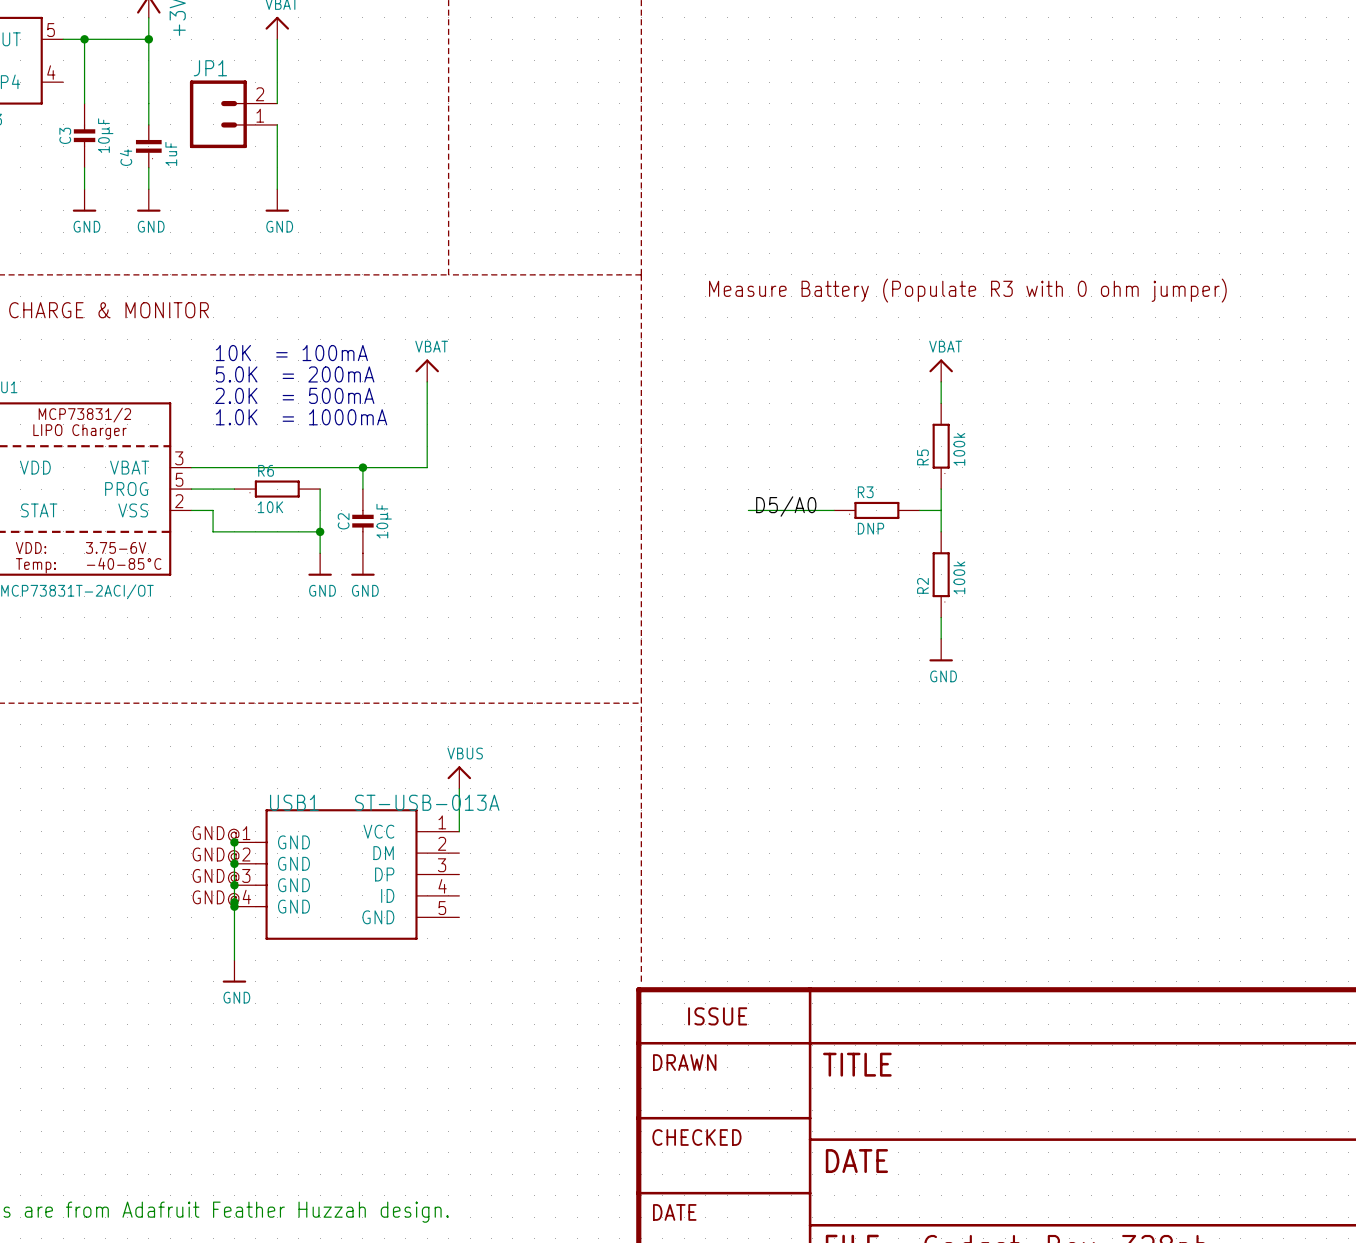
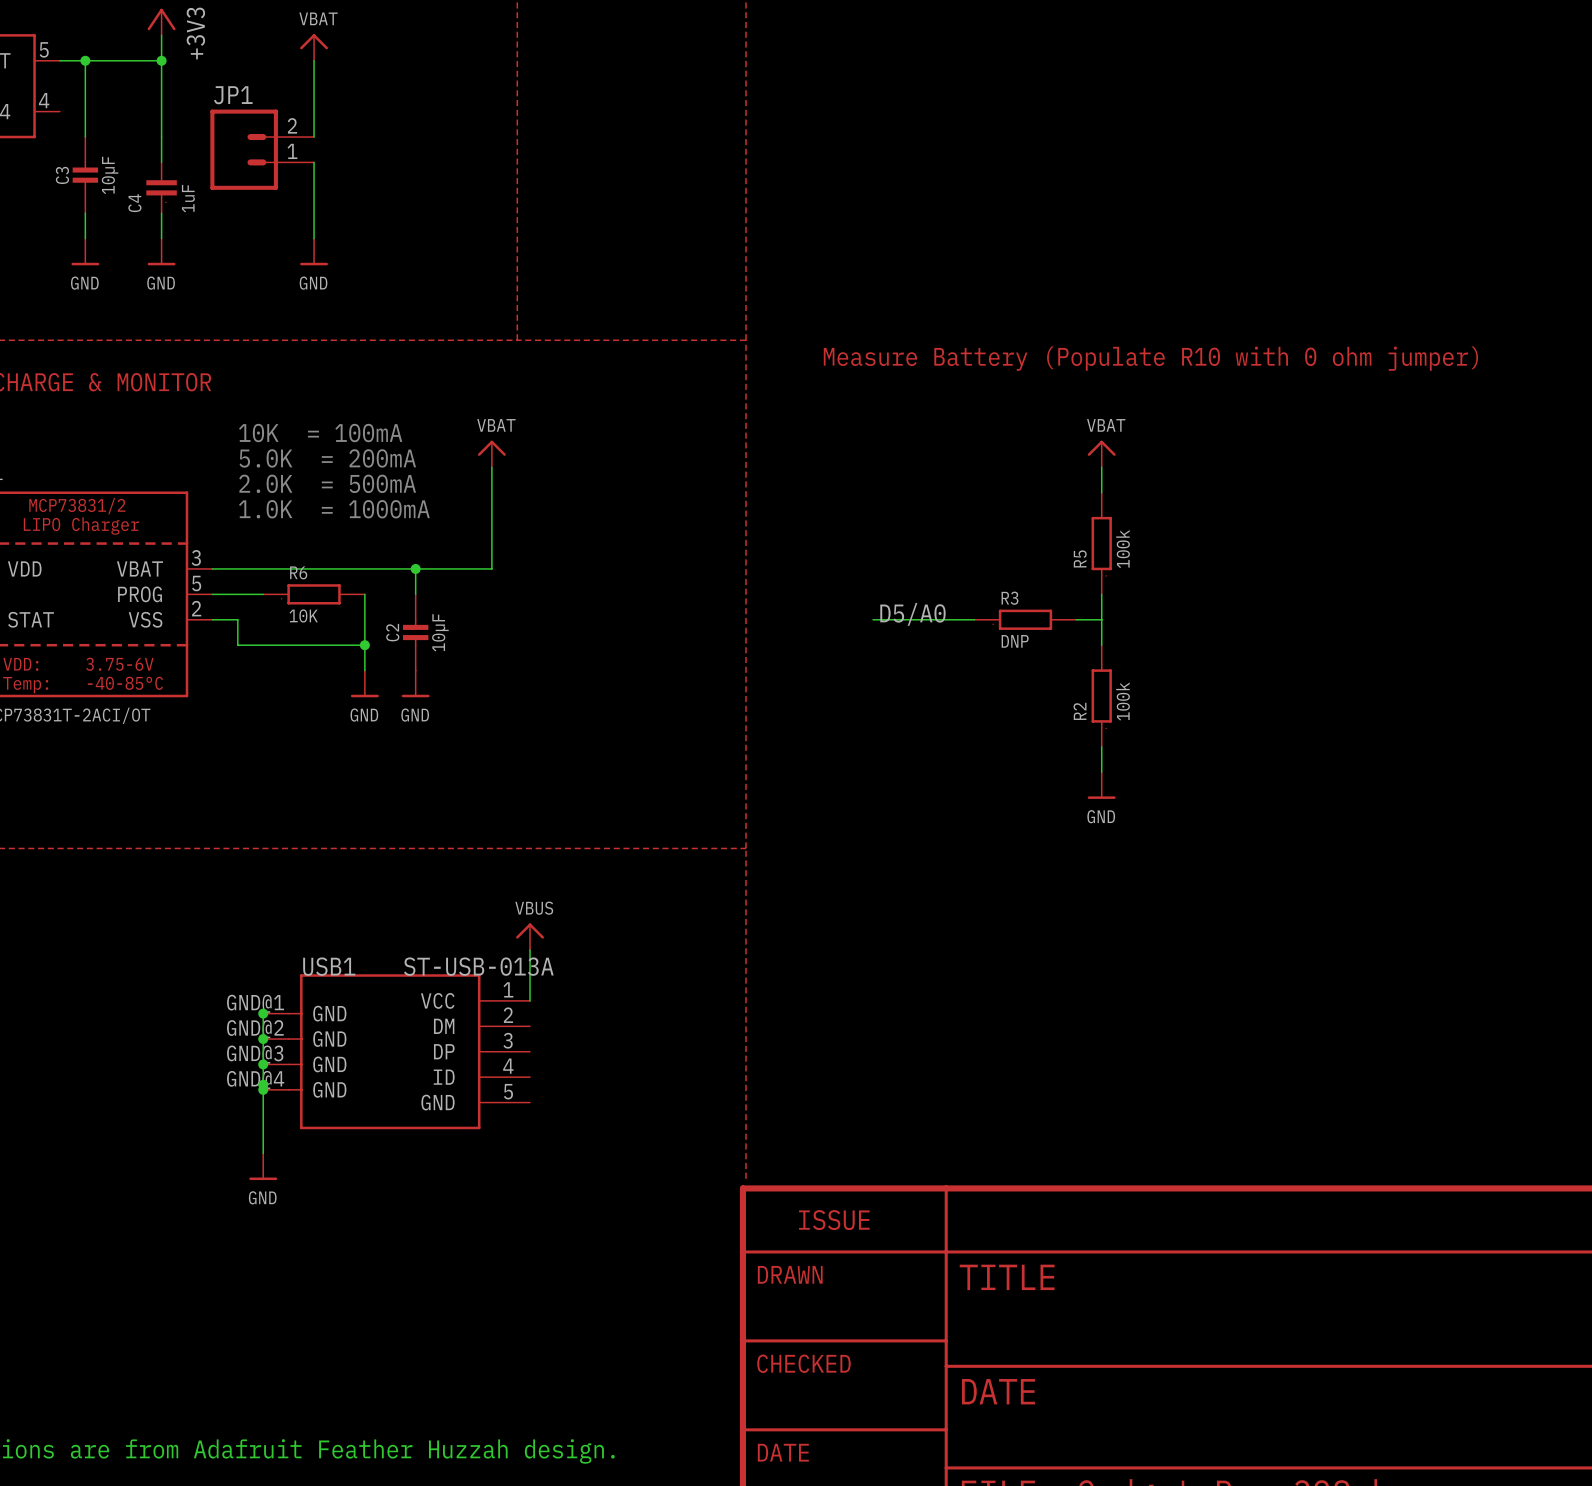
text: Measure Battery (Populate R3 with 0 ohm jumper) (967, 290) -> Measure Battery (Populate R10 with 0 ohm jumper) (1150, 358)

